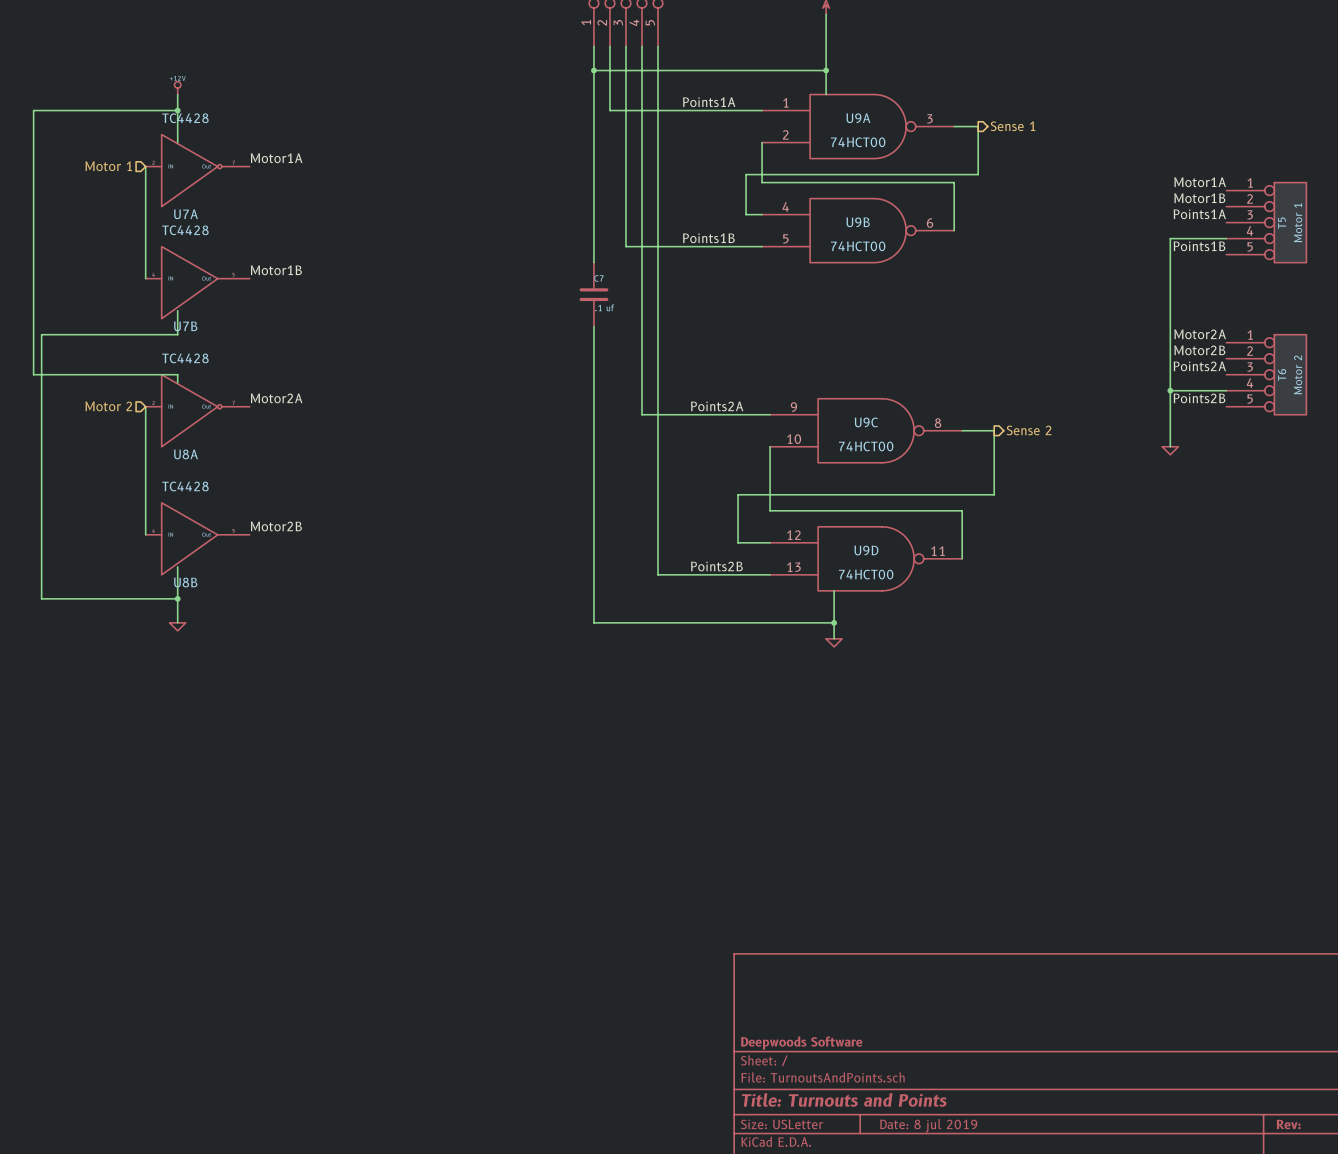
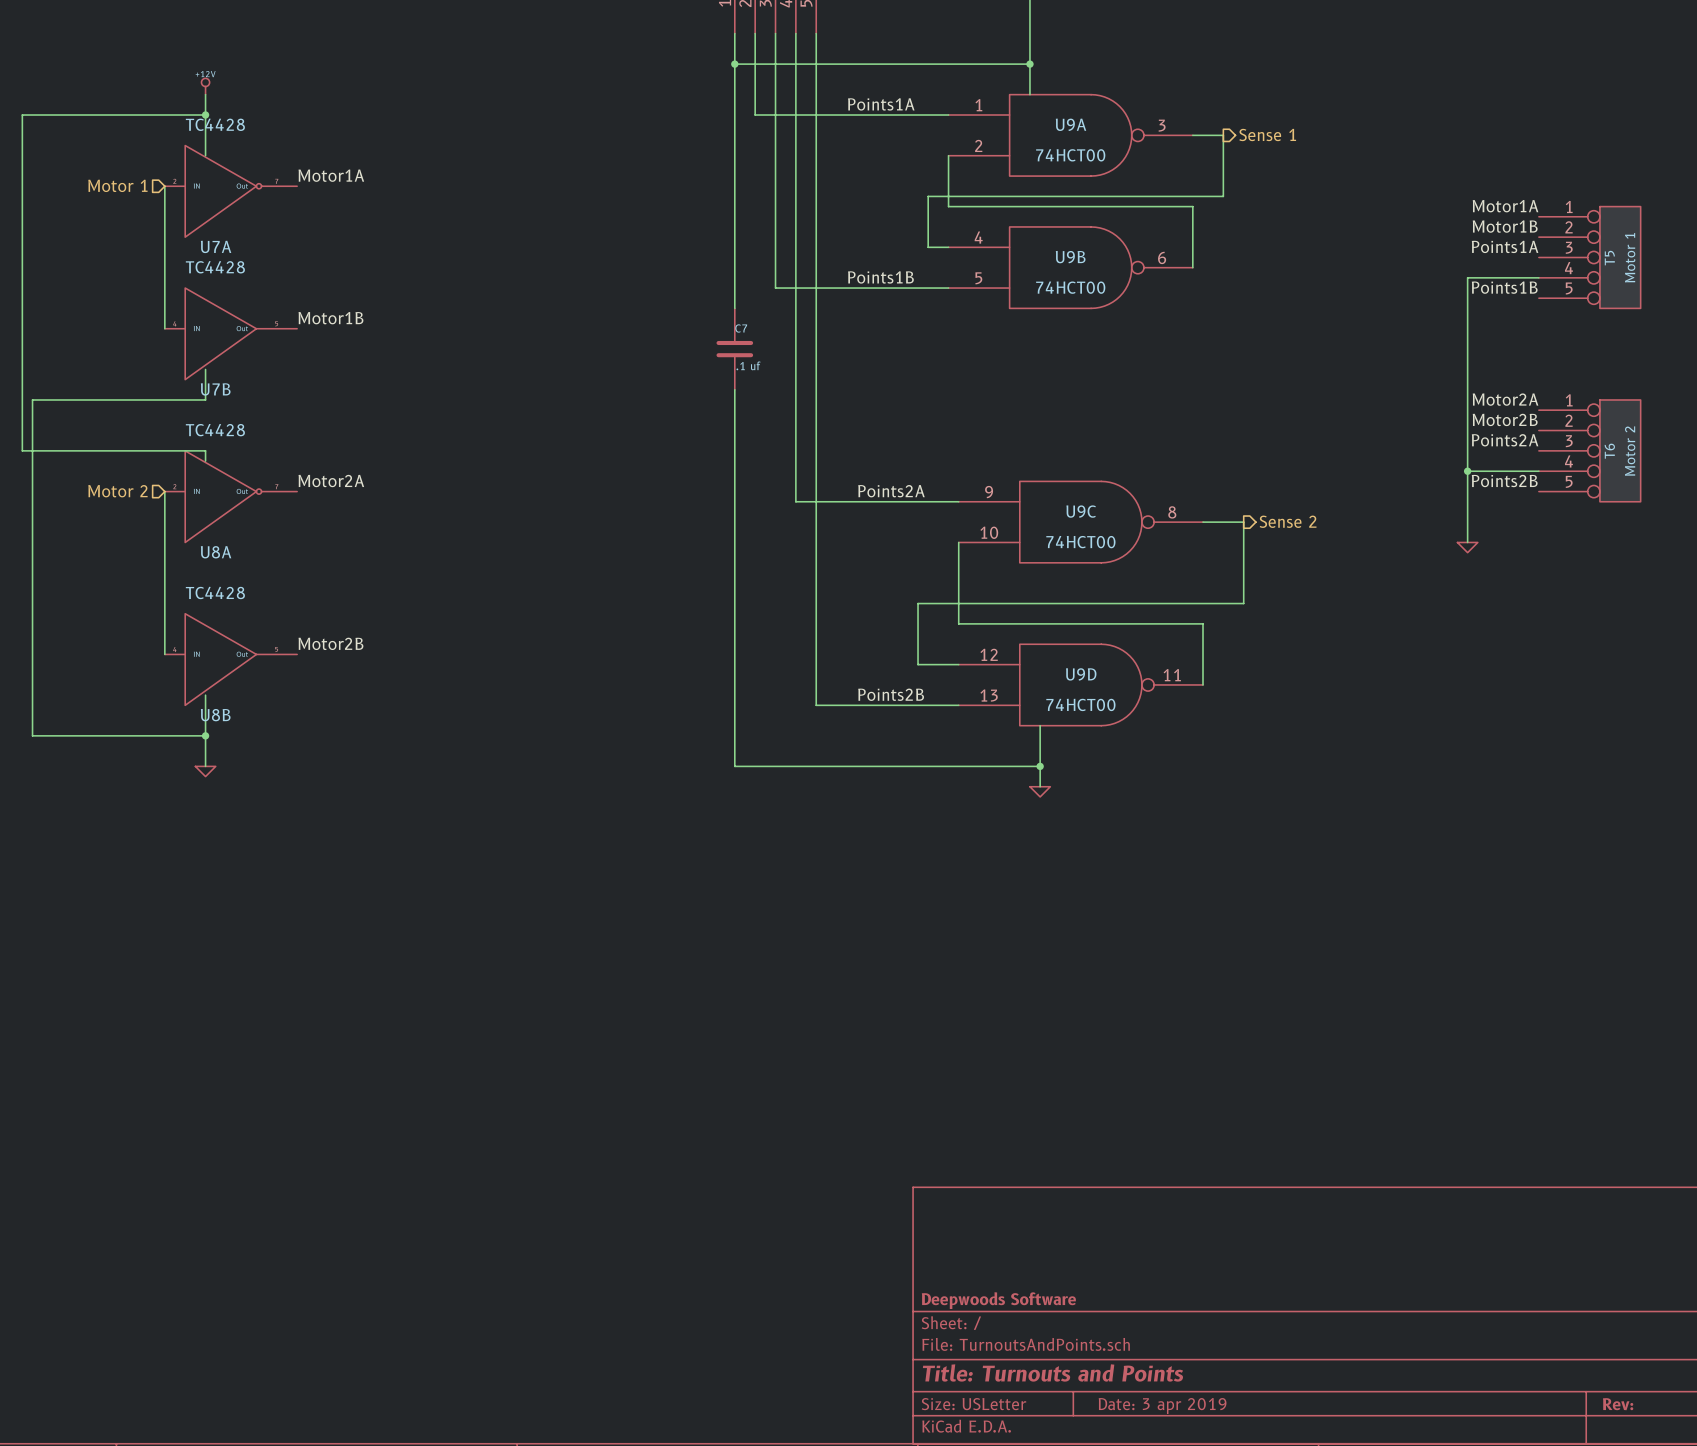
title block: Date: 8 jul 2019 (928, 1125) -> Date: 3 apr 2019 (1162, 1406)

